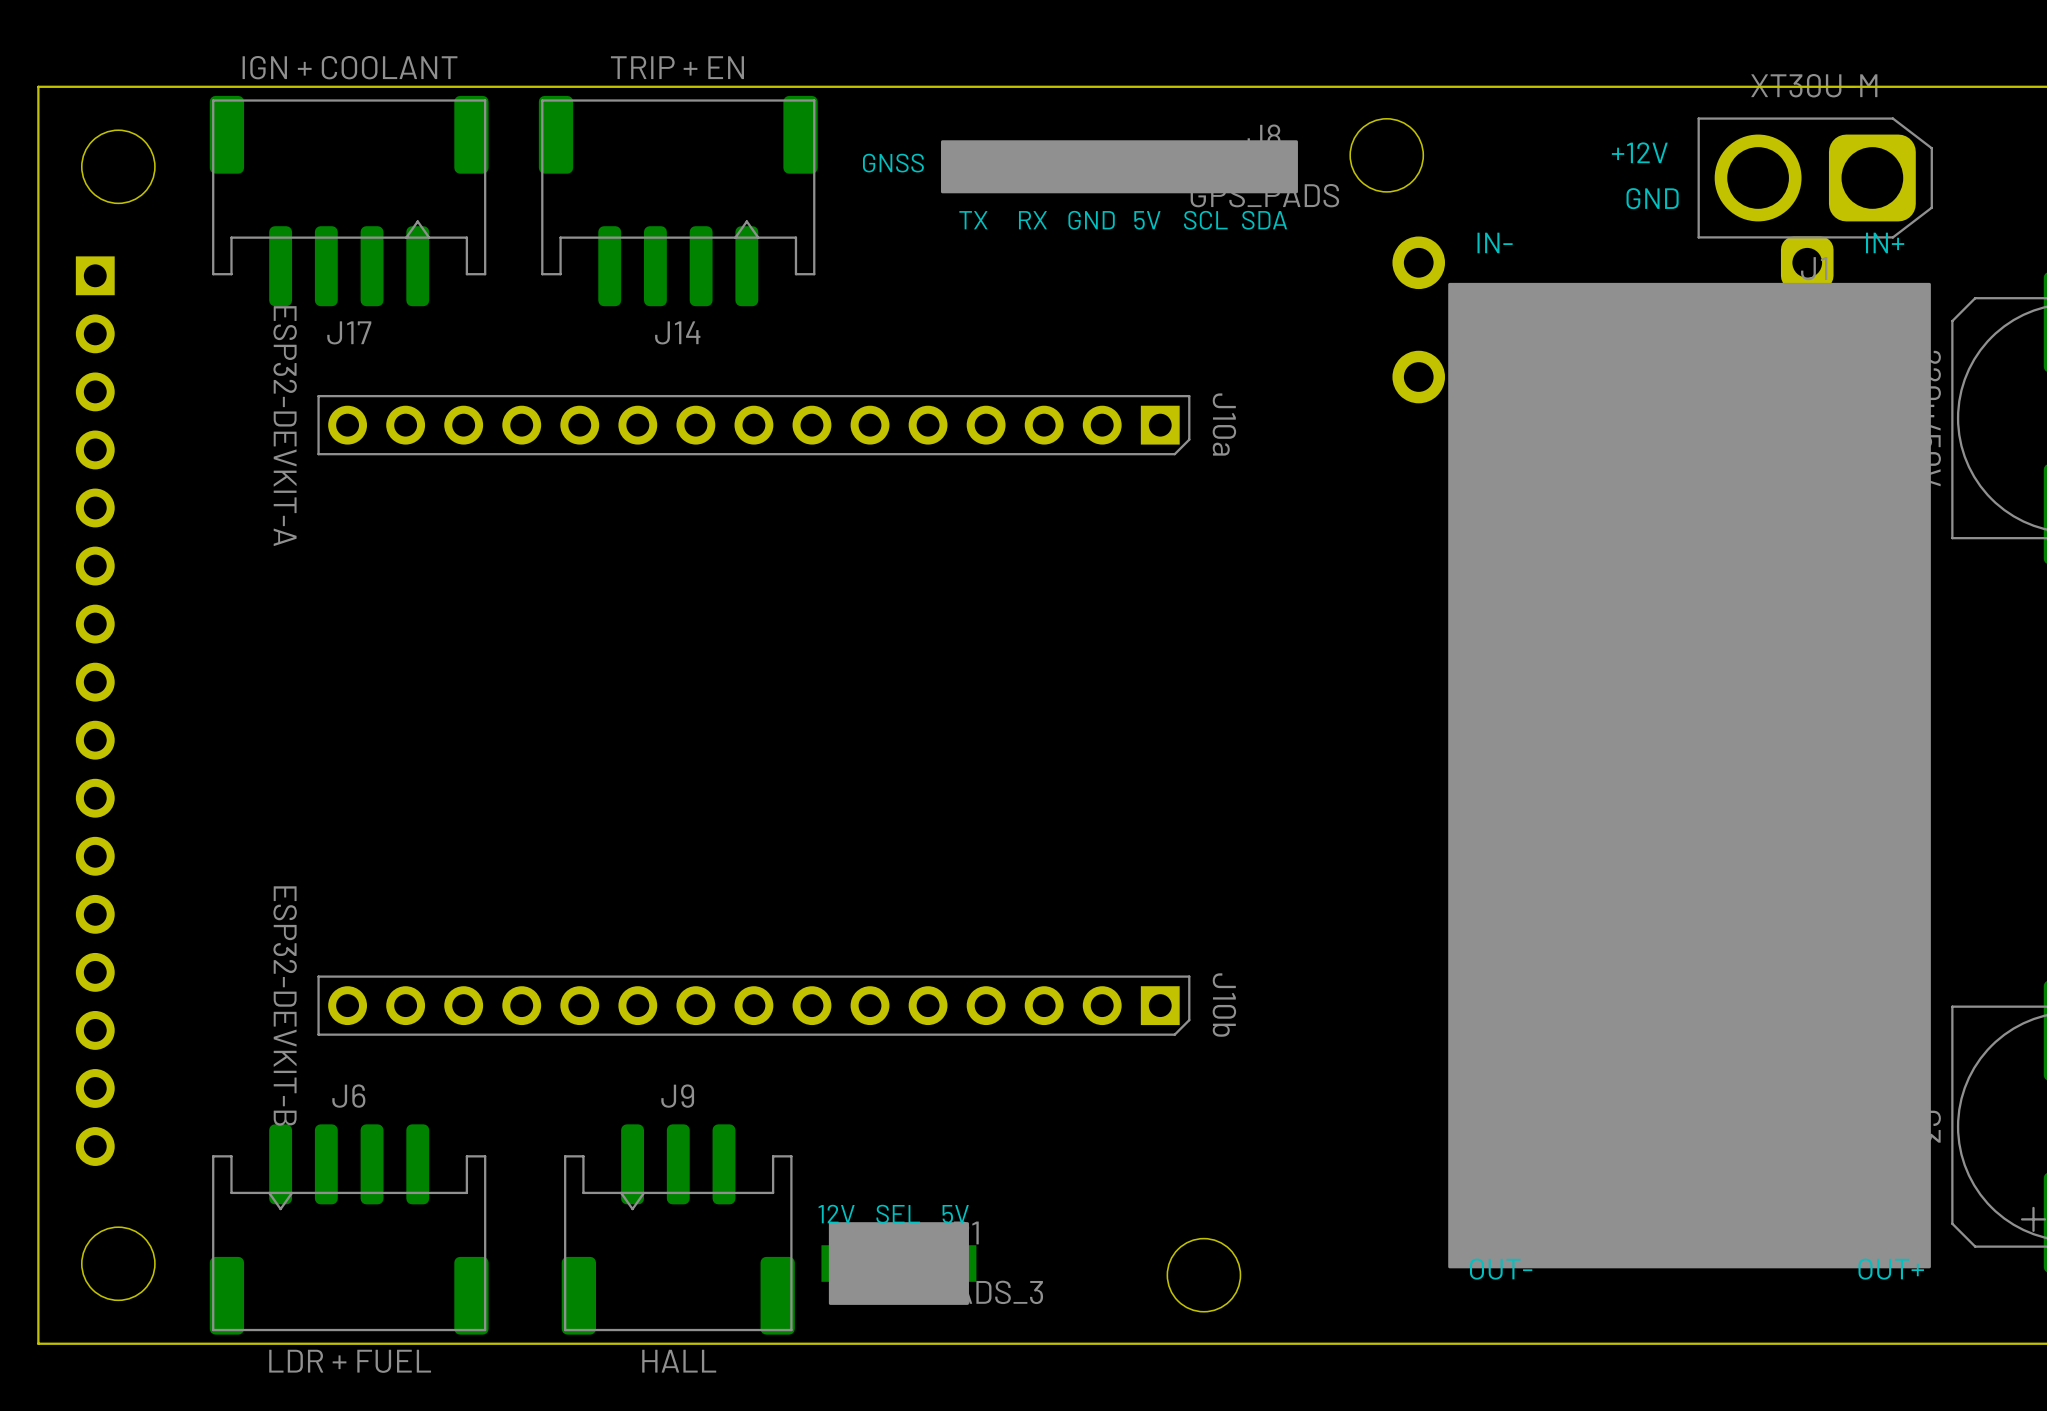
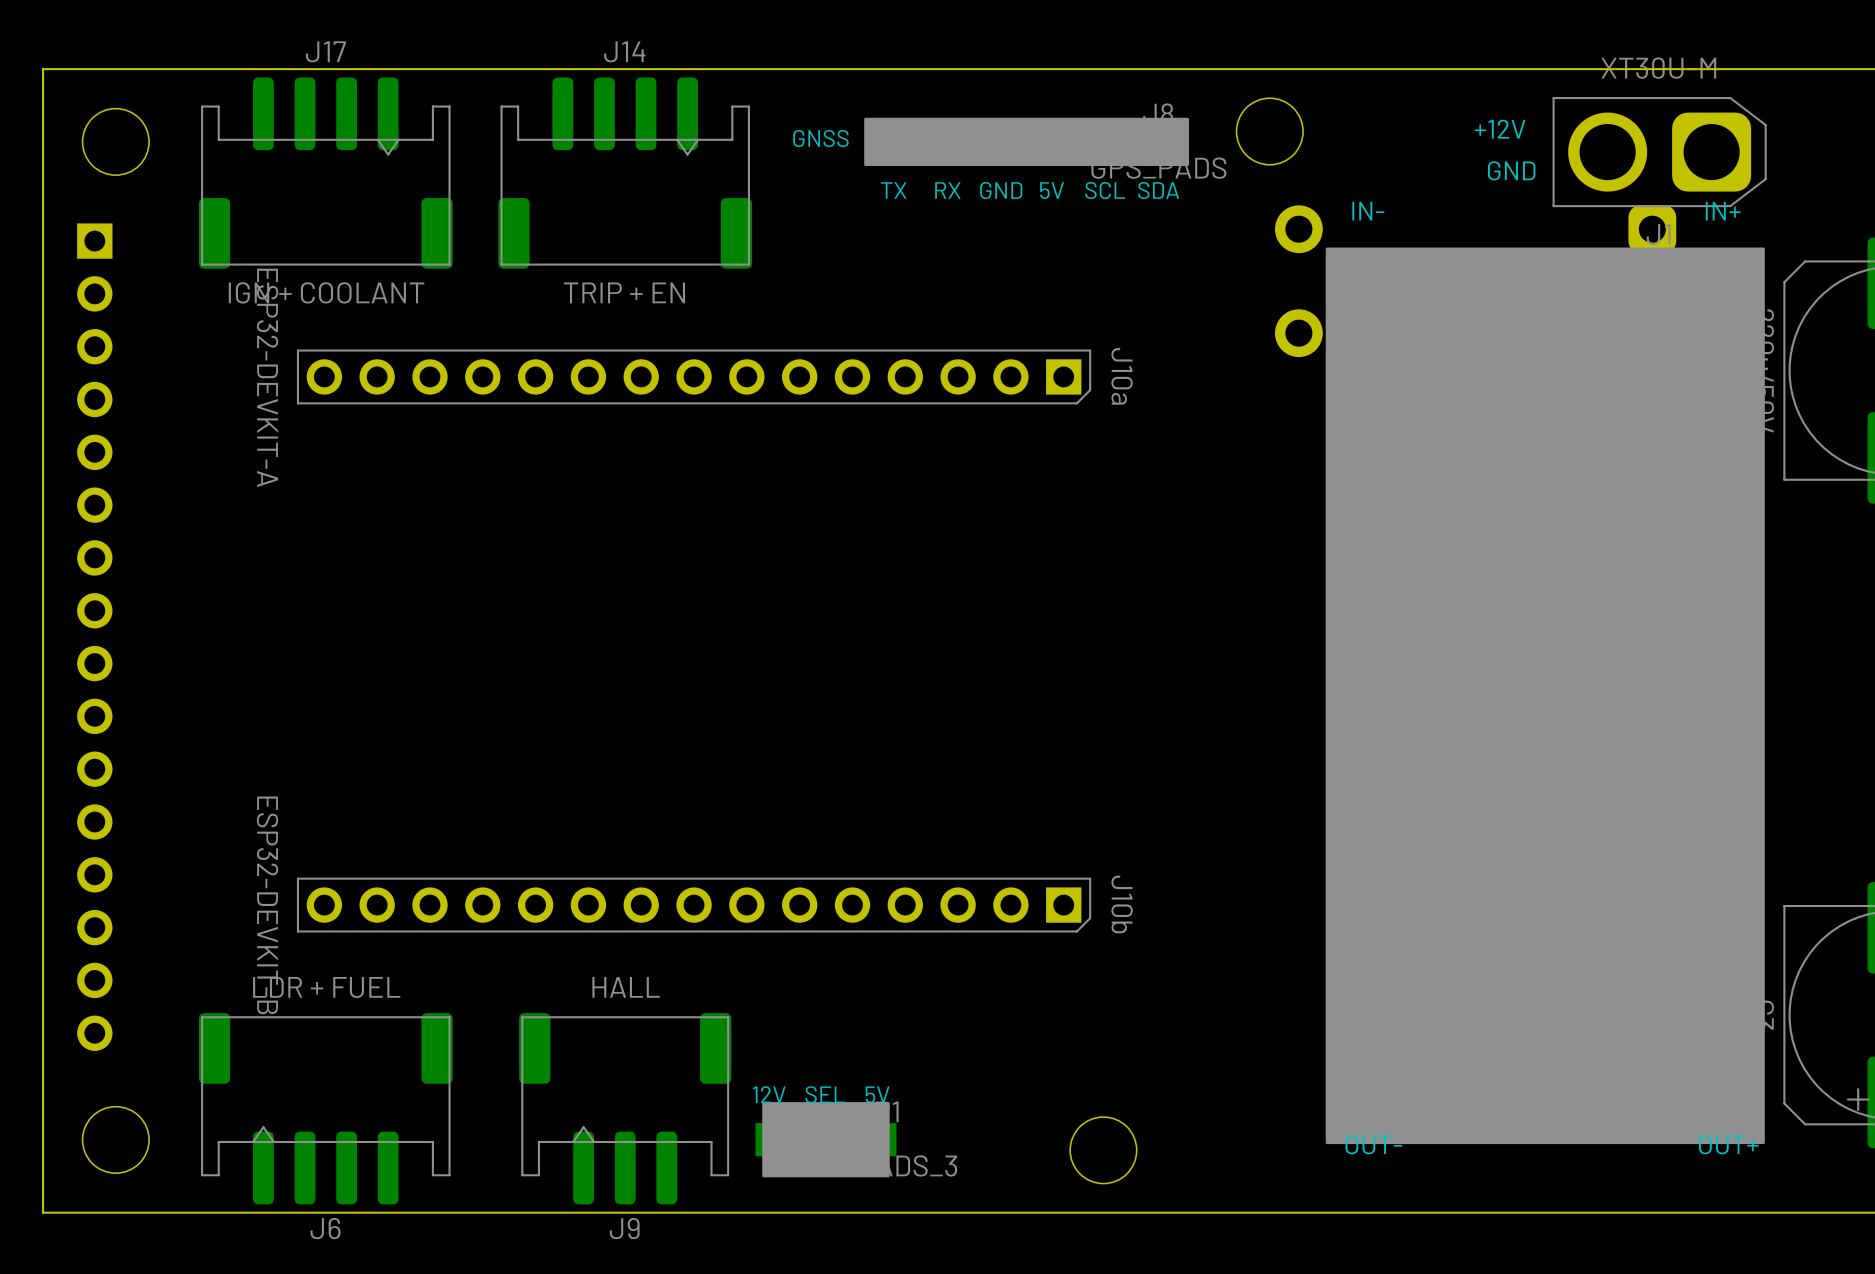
J17 value position: IGN + COOLANT (350, 67) -> IGN + COOLANT (326, 292)
J14 value position: TRIP + EN (677, 67) -> TRIP + EN (624, 292)
J17 footprint: [209, 95, 489, 307] -> [198, 77, 453, 269]
J14 footprint: [538, 95, 818, 307] -> [498, 77, 753, 269]
J17 name position: J17 (349, 332) -> J17 (325, 51)
J14 name position: J14 (677, 332) -> J14 (624, 51)
J6 name position: J6 (348, 1096) -> J6 (325, 1228)
J9 name position: J9 (677, 1096) -> J9 (624, 1228)
J6 footprint: [209, 1124, 489, 1335] -> [198, 1013, 453, 1205]
J9 footprint: [561, 1124, 795, 1335] -> [519, 1013, 732, 1205]
J6 value position: LDR + FUEL (350, 1361) -> LDR + FUEL (326, 987)
J9 value position: HALL (679, 1361) -> HALL (626, 987)

